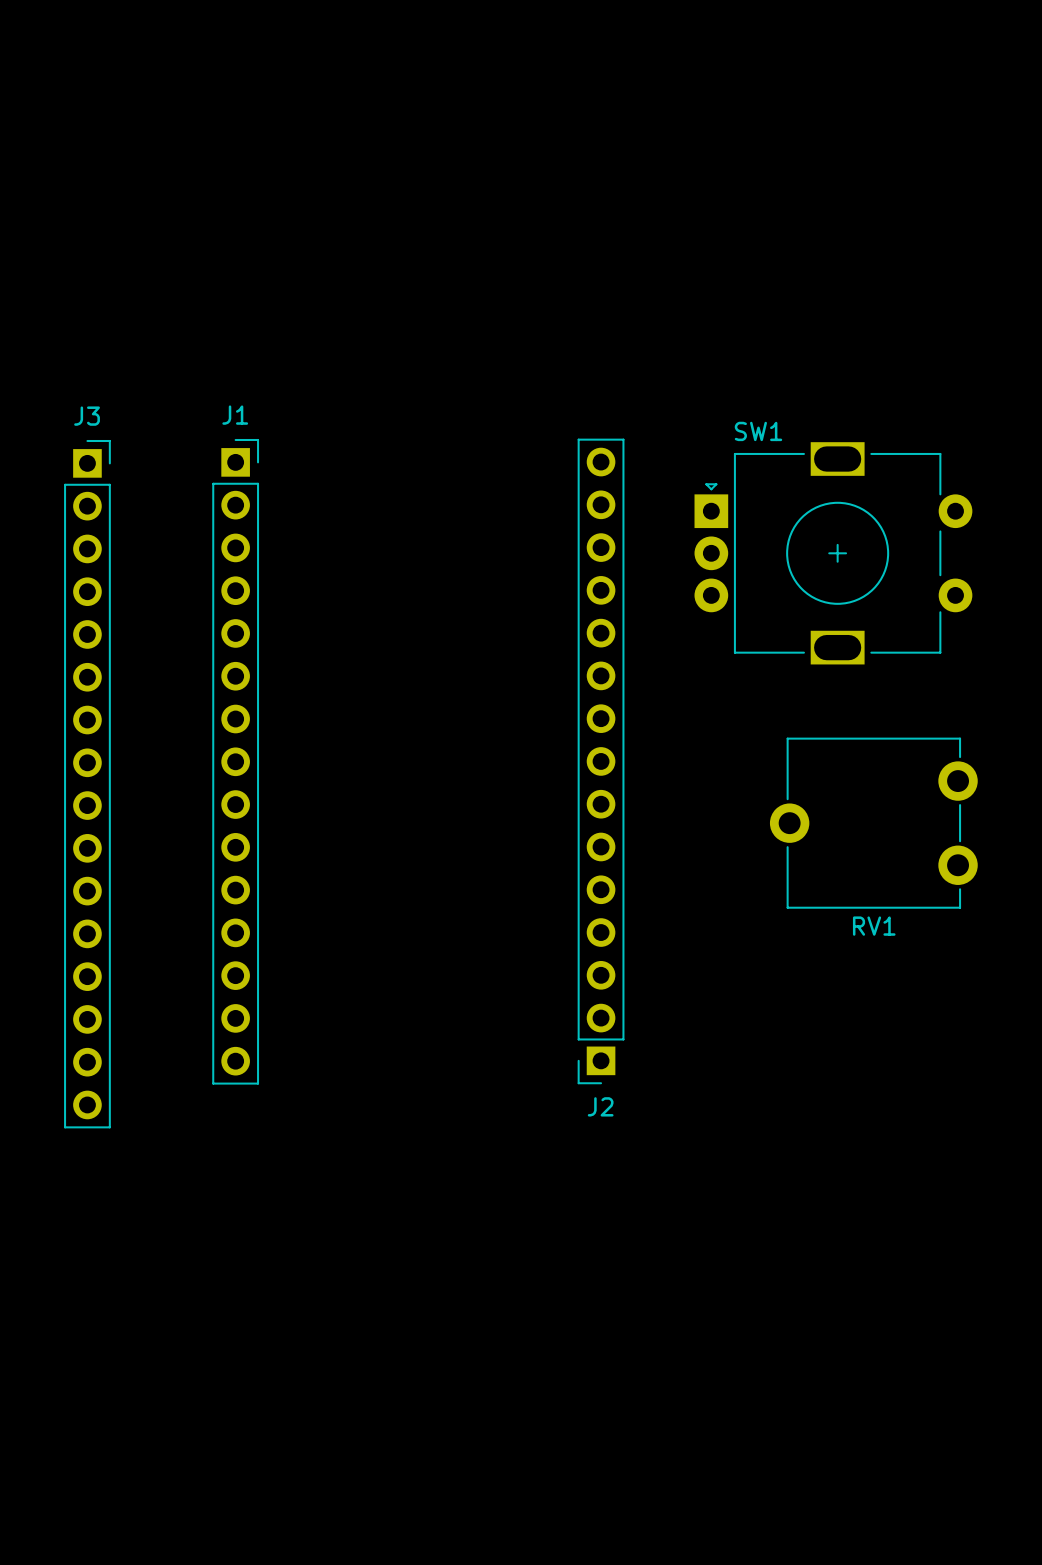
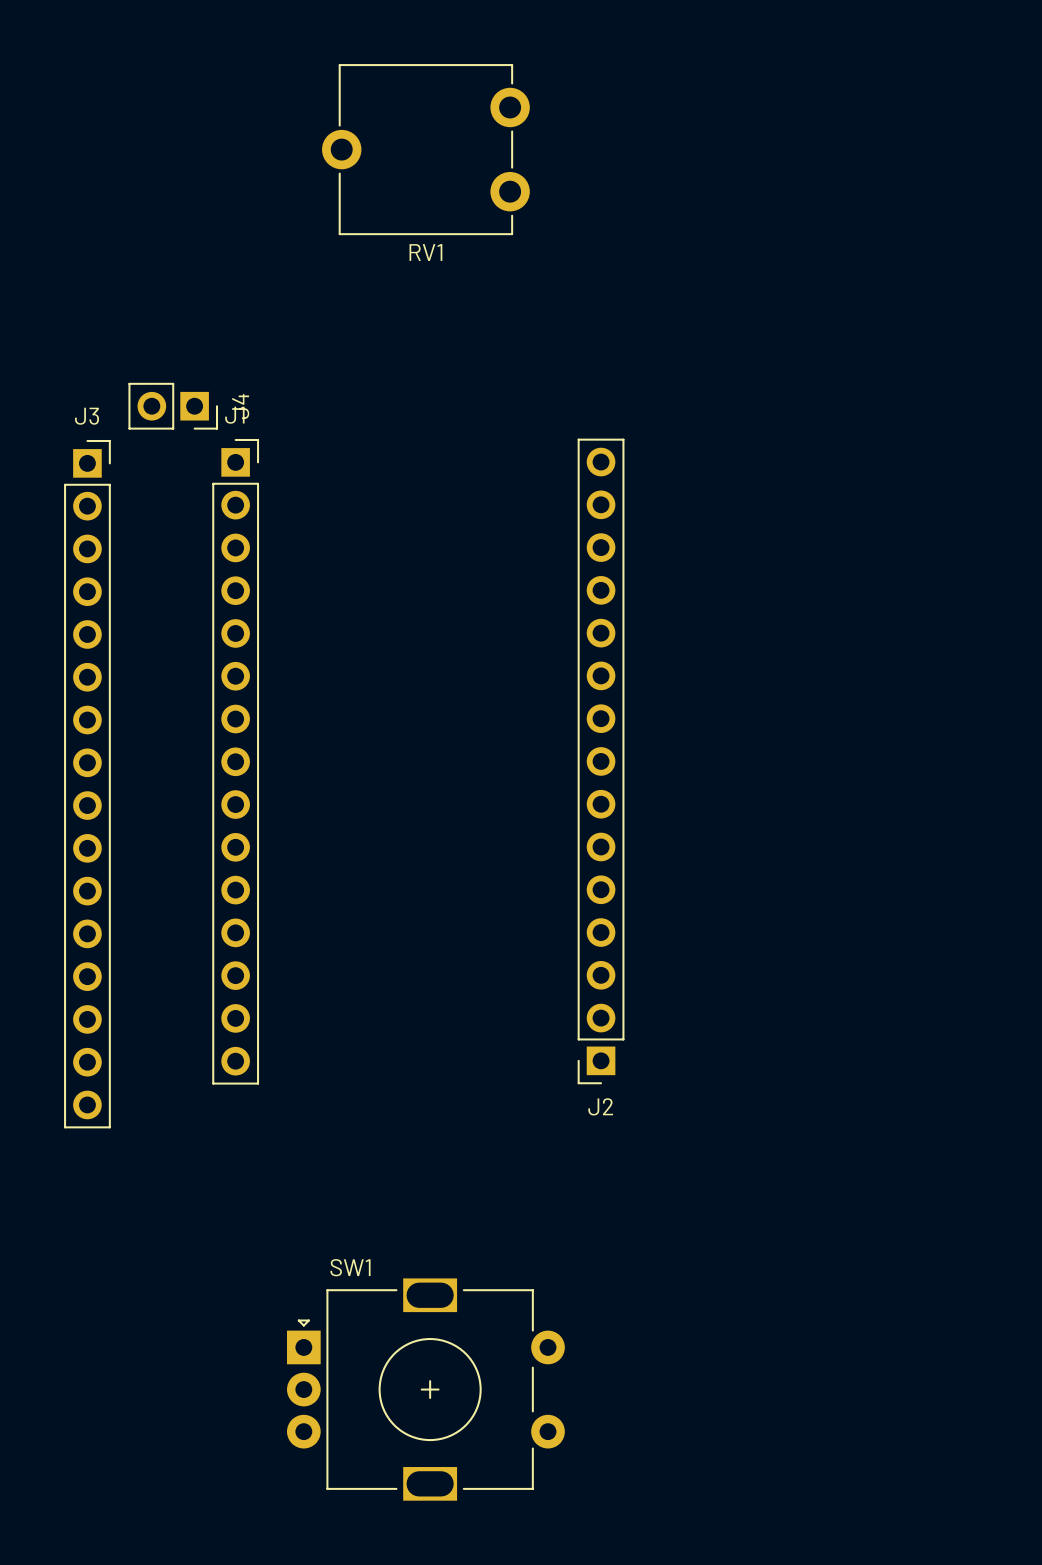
J4: none -> (173, 406)
SW1 position: (833, 553) -> (425, 1389)
RV1 position: (873, 823) -> (425, 149)

